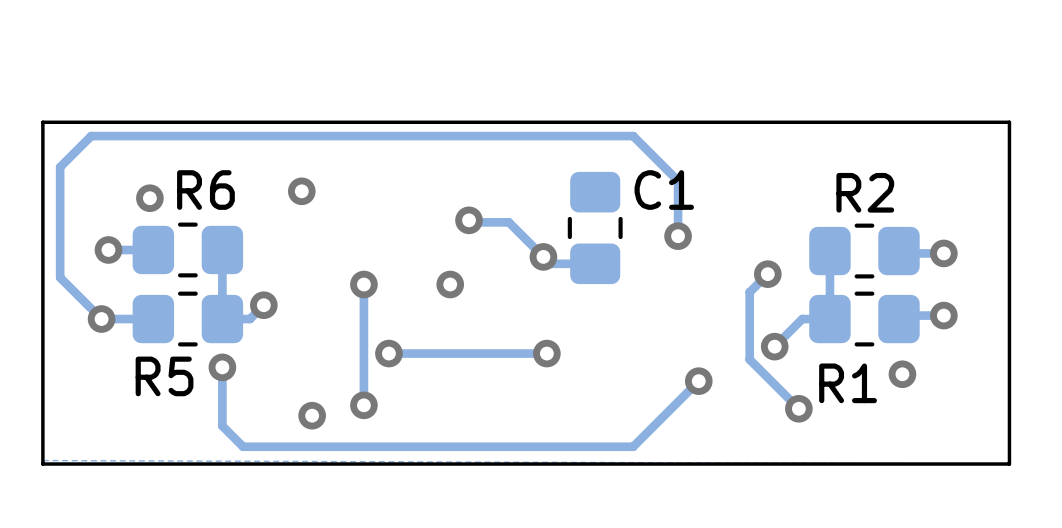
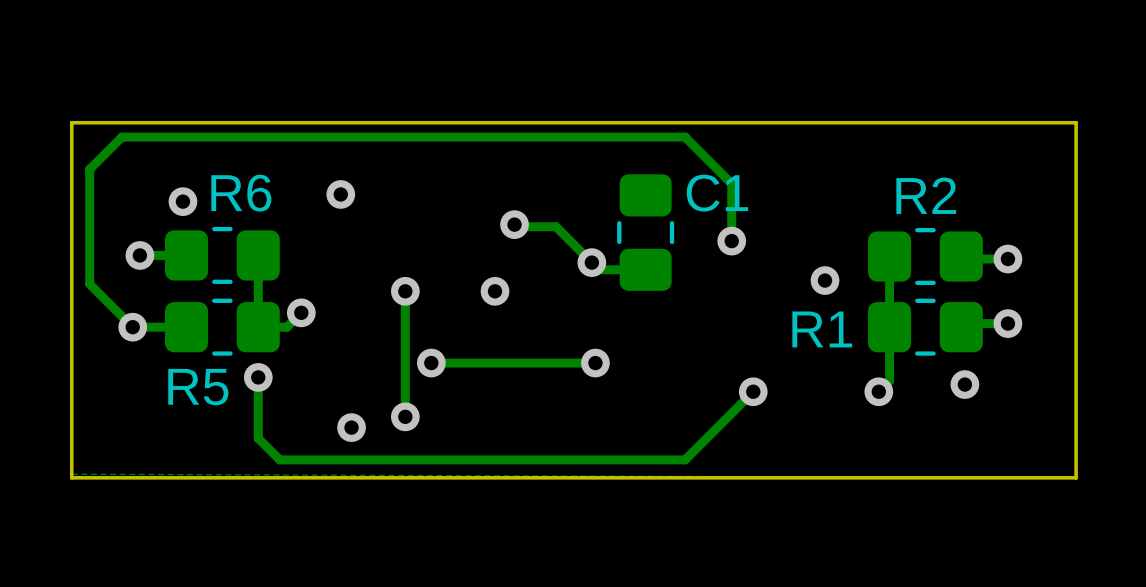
track: (767, 274) (749, 292) (749, 359) (798, 408) -> none
track: (829, 319) (802, 319) (774, 346) -> (889, 327) (889, 380) (878, 391)
via: (774, 346) -> none
R1 name position: R1 (848, 383) -> R1 (822, 329)
via position: (798, 408) -> (878, 391)

